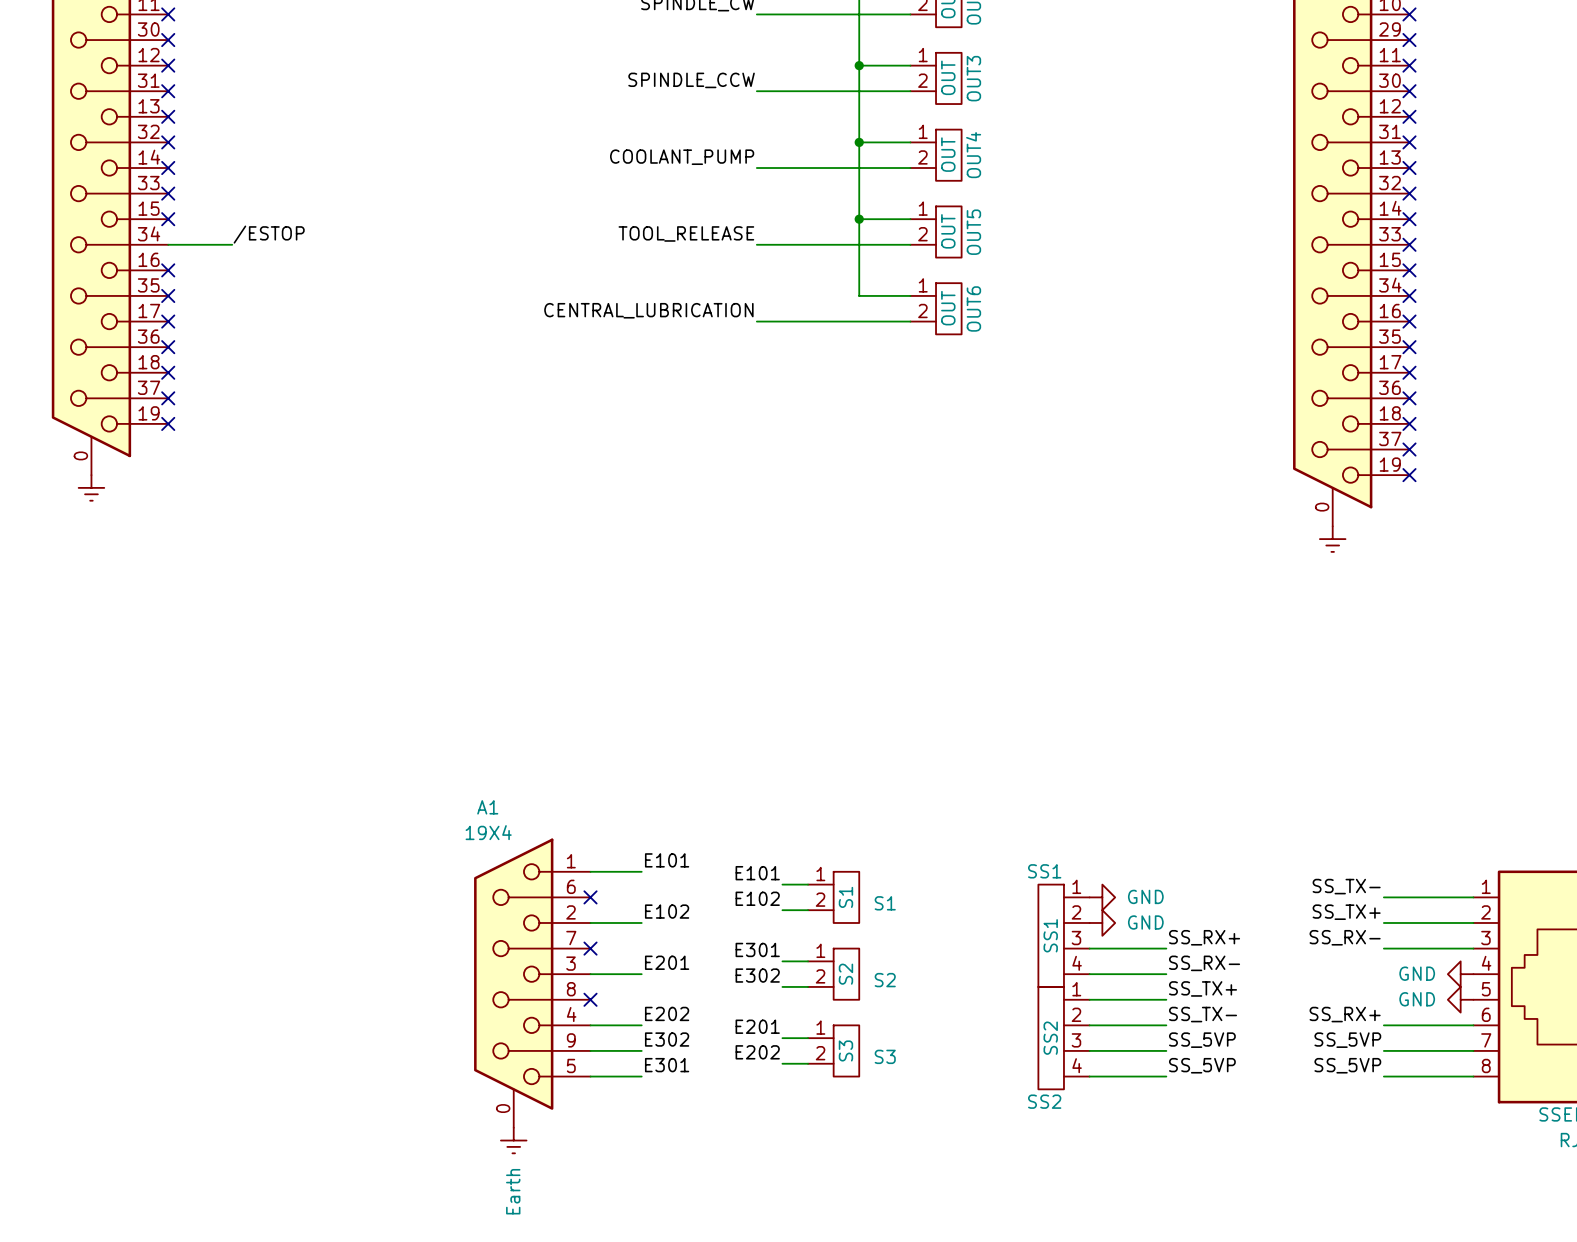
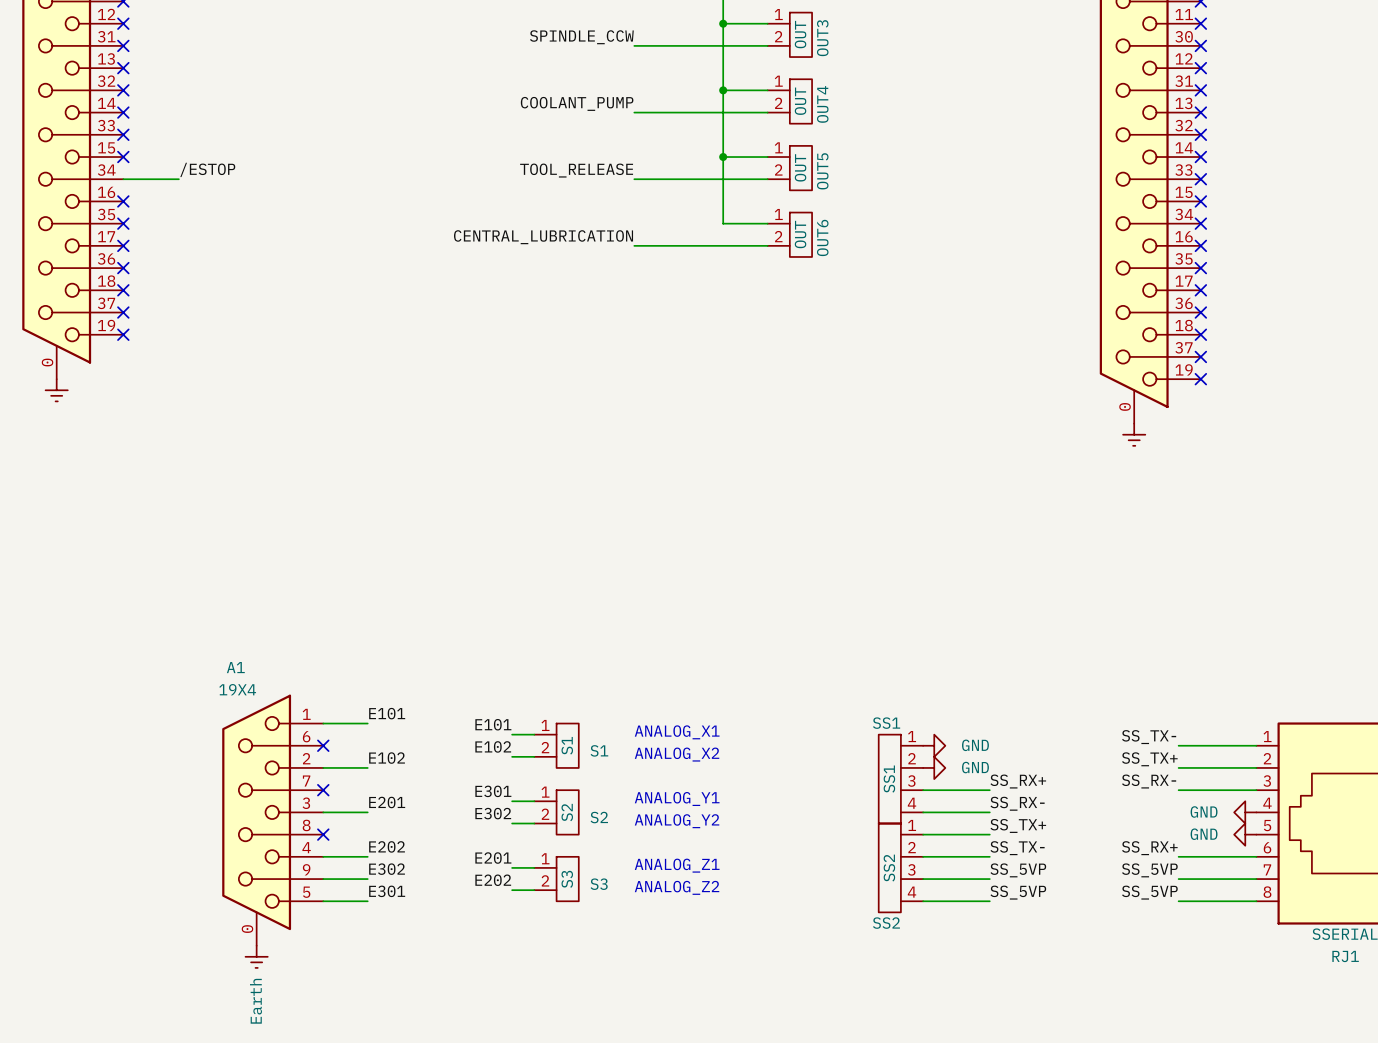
label: none -> E101 (387, 713)
label position: E101 (667, 860) -> E101 (493, 724)
wire: (590, 871) (641, 871) -> (323, 723) (367, 723)
label: E101 (757, 873) -> none
text: none -> ANALOG_X1 (677, 732)
wire: (782, 884) (808, 884) -> (512, 734) (534, 734)
no-connect mark: none -> (323, 745)
no-connect mark: (590, 897) -> none
S1 position: (833, 897) -> (556, 745)
label: E102 (757, 898) -> none
text: none -> ANALOG_X2 (677, 754)
wire: (782, 910) (808, 910) -> (512, 756) (534, 756)
label: none -> E102 (387, 758)
label position: E102 (667, 911) -> E102 (493, 746)
wire: (590, 922) (641, 922) -> (323, 767) (367, 767)
no-connect mark: none -> (323, 790)
no-connect mark: (590, 948) -> none
label: none -> E301 (493, 791)
label: E301 (757, 949) -> none
text: none -> ANALOG_Y1 (677, 798)
wire: (782, 961) (808, 961) -> (512, 801) (534, 801)
label: none -> E201 (387, 802)
label position: E201 (667, 962) -> E201 (493, 858)
wire: (590, 974) (641, 974) -> (323, 812) (367, 812)
S2 position: (833, 974) -> (556, 812)
label: E302 (757, 975) -> none
A1 position: (532, 983) -> (272, 820)
text: none -> ANALOG_Y2 (677, 821)
wire: (782, 986) (808, 986) -> (512, 823) (534, 823)
no-connect mark: none -> (323, 834)
no-connect mark: (590, 999) -> none
label: none -> E202 (387, 846)
label position: E202 (667, 1013) -> E202 (493, 880)
wire: (590, 1025) (641, 1025) -> (323, 856) (367, 856)
label: E201 (757, 1026) -> none
text: none -> ANALOG_Z1 (677, 865)
wire: (782, 1038) (808, 1038) -> (512, 867) (534, 867)
label: none -> E302 (387, 869)
label position: E302 (667, 1039) -> E302 (493, 813)
wire: (590, 1050) (641, 1050) -> (323, 879) (367, 879)
S3 position: (833, 1050) -> (556, 879)
label: E202 (757, 1052) -> none
text: none -> ANALOG_Z2 (677, 887)
wire: (782, 1063) (808, 1063) -> (512, 890) (534, 890)
label: none -> E301 (387, 891)
label: E301 (667, 1065) -> none
wire: (590, 1076) (641, 1076) -> (323, 901) (367, 901)
power symbol position: Earth (513, 1140) -> Earth (256, 956)

